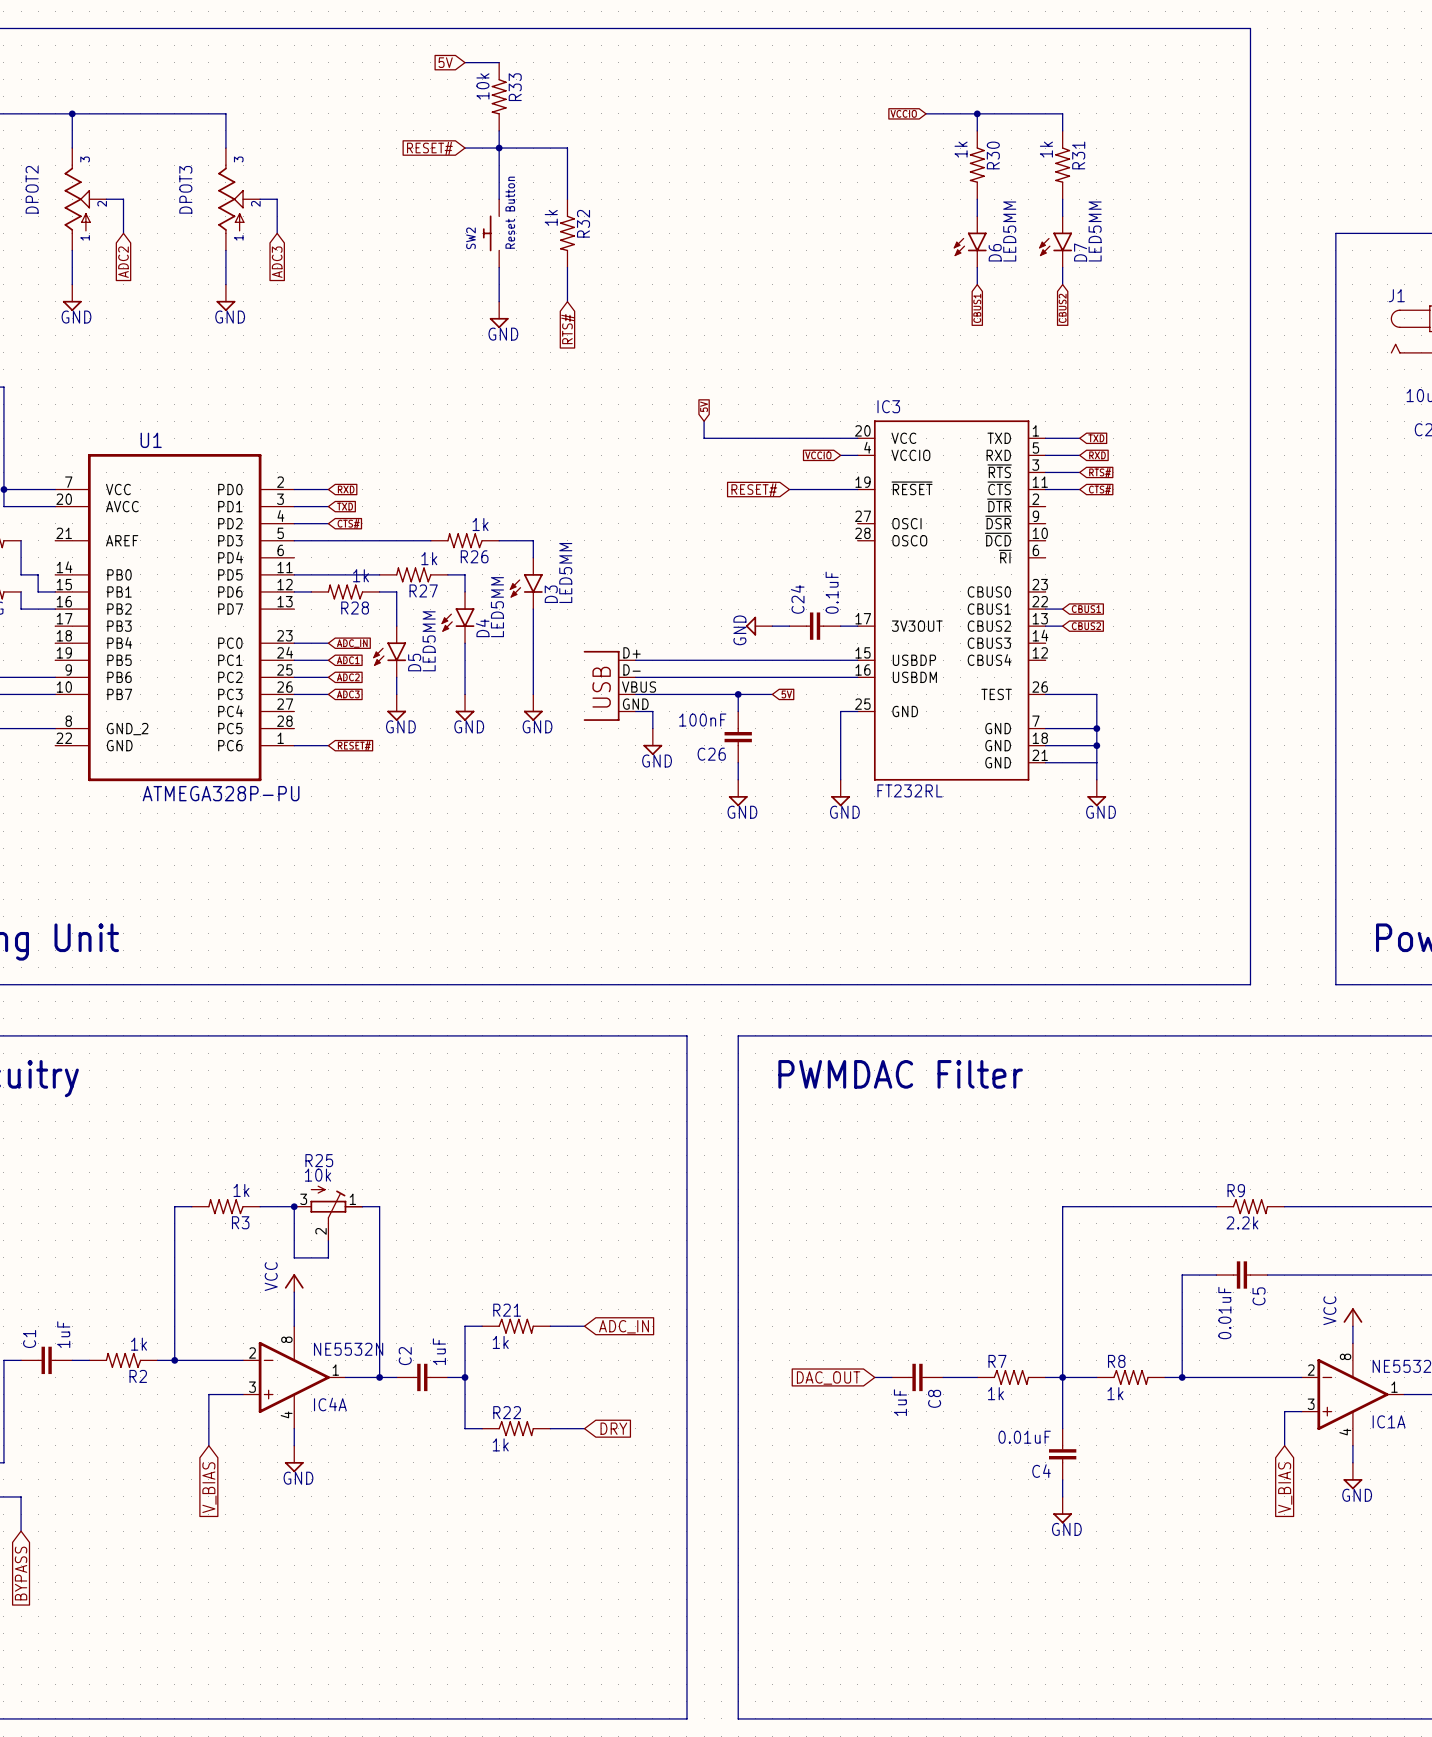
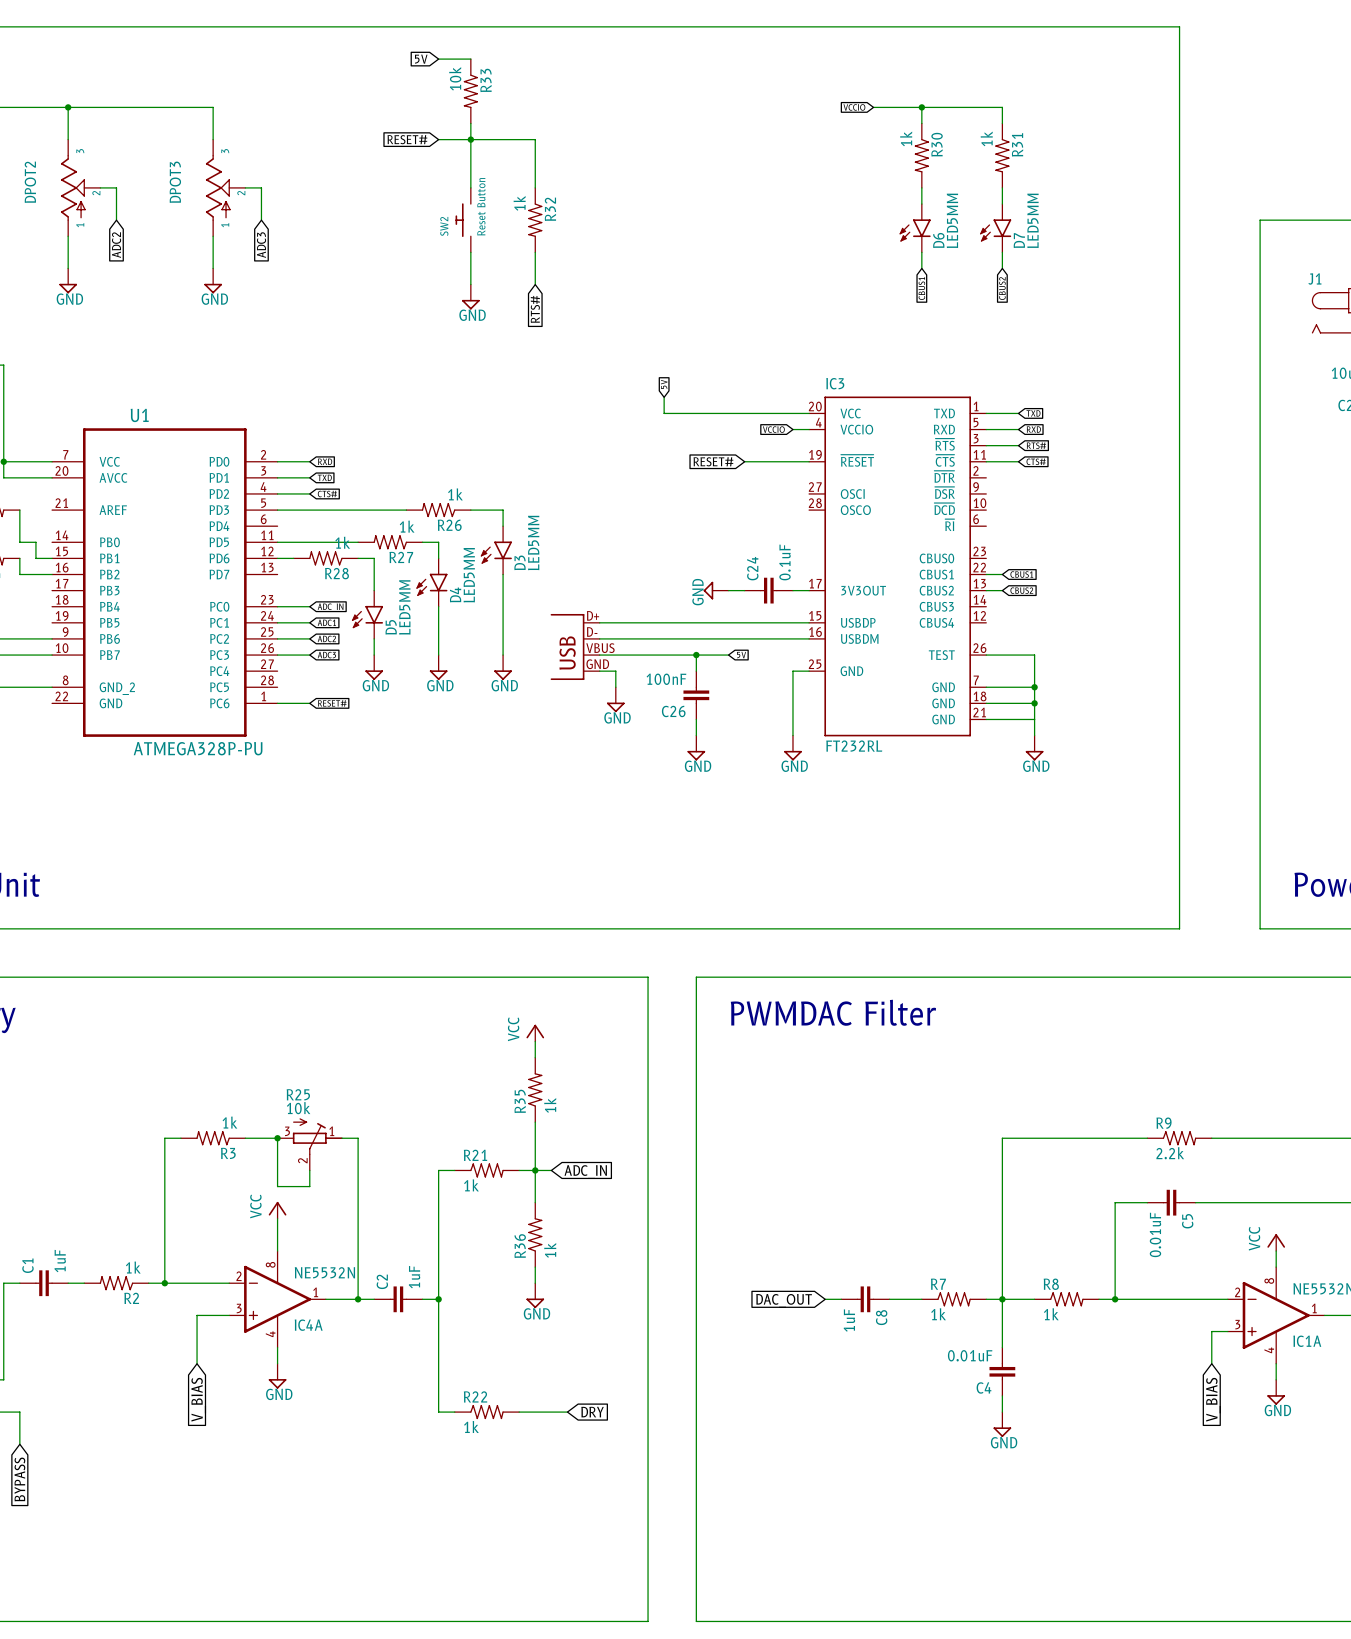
power symbol: none -> VCC (535, 1033)
wire: none -> (535, 1041) (535, 1057)
R35: none -> 1k (535, 1089)
wire: none -> (535, 1122) (535, 1202)
junction: none -> (535, 1170)
R36: none -> 1k (535, 1234)
wire: (465, 1326) (482, 1326) -> (438, 1251) (438, 1170) (454, 1170)
R21 position: (516, 1326) -> (486, 1170)
wire: (550, 1326) (584, 1326) -> (519, 1170) (551, 1170)
global label position: ADC_IN (624, 1326) -> ADC_IN (585, 1172)
wire: none -> (535, 1267) (535, 1283)
power symbol: none -> GND (535, 1295)
wire: (465, 1428) (482, 1428) -> (438, 1347) (438, 1412) (454, 1412)
R22 position: (516, 1428) -> (486, 1412)
wire: (550, 1428) (584, 1428) -> none
global label position: DRY (613, 1428) -> DRY (592, 1412)
wire: none -> (519, 1412) (567, 1412)

